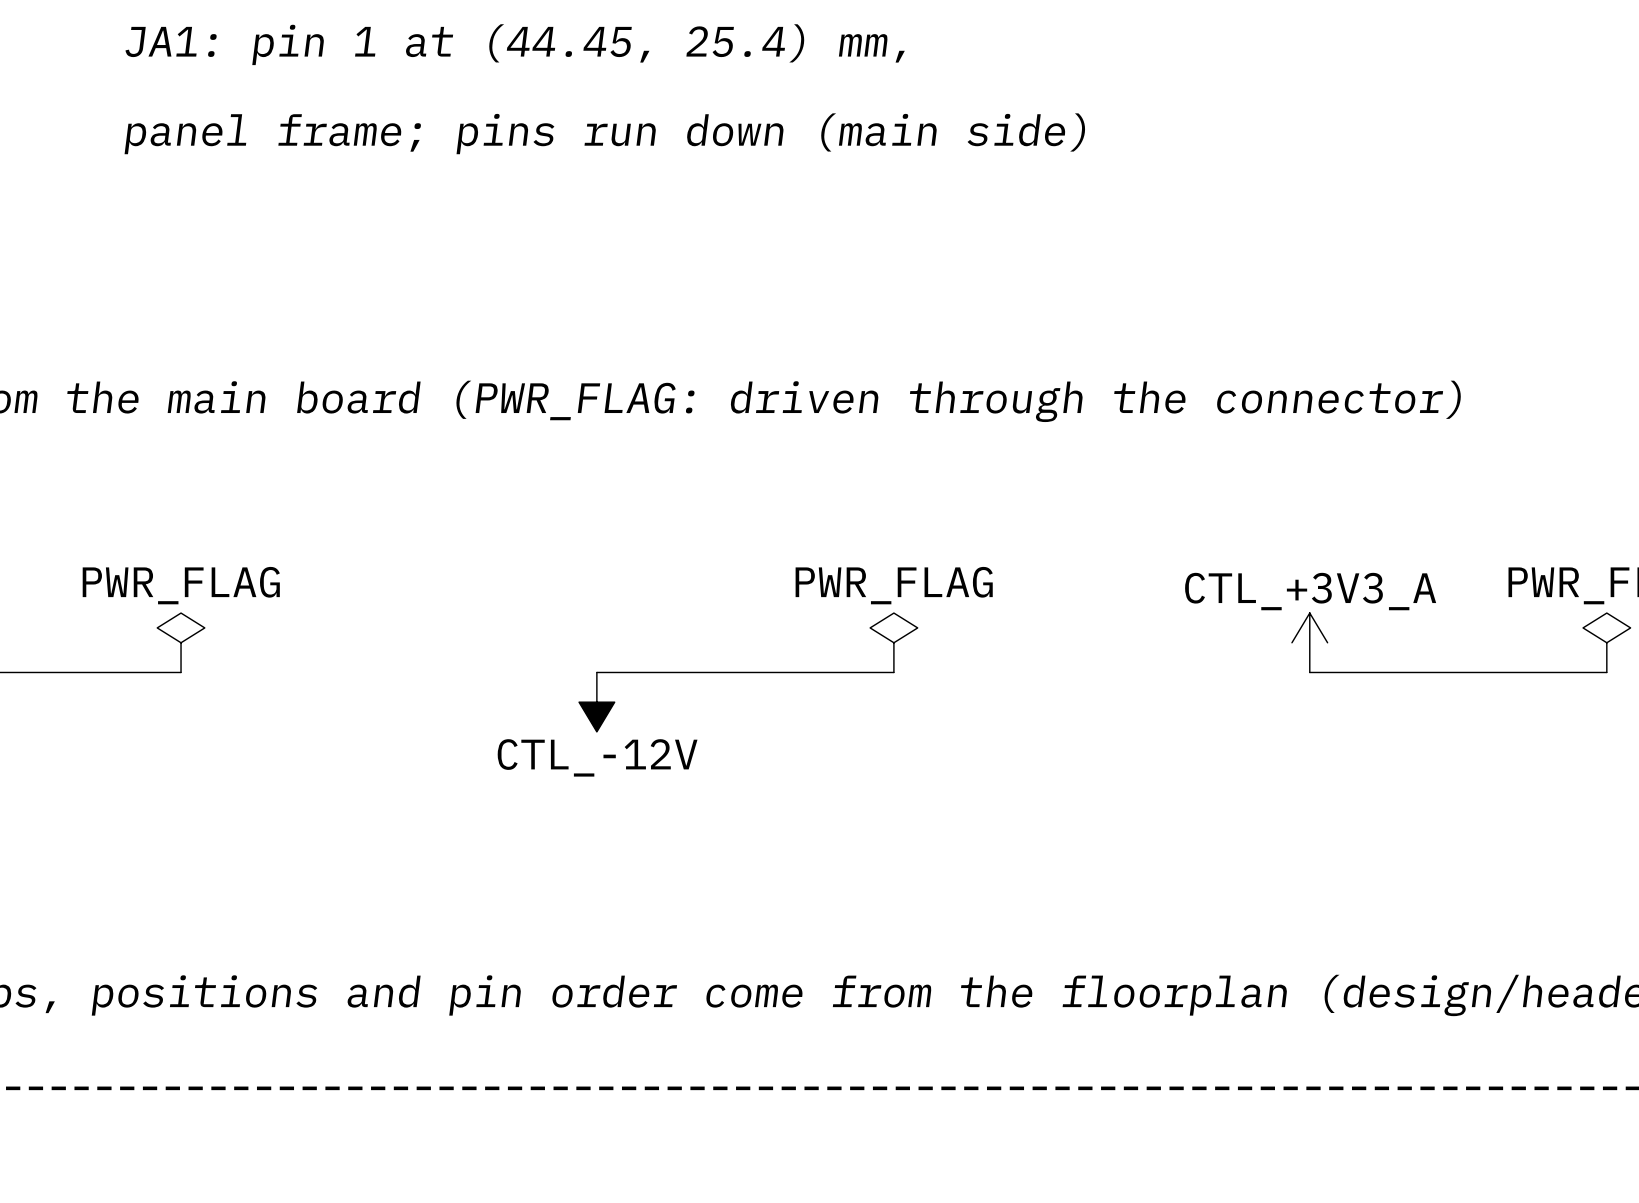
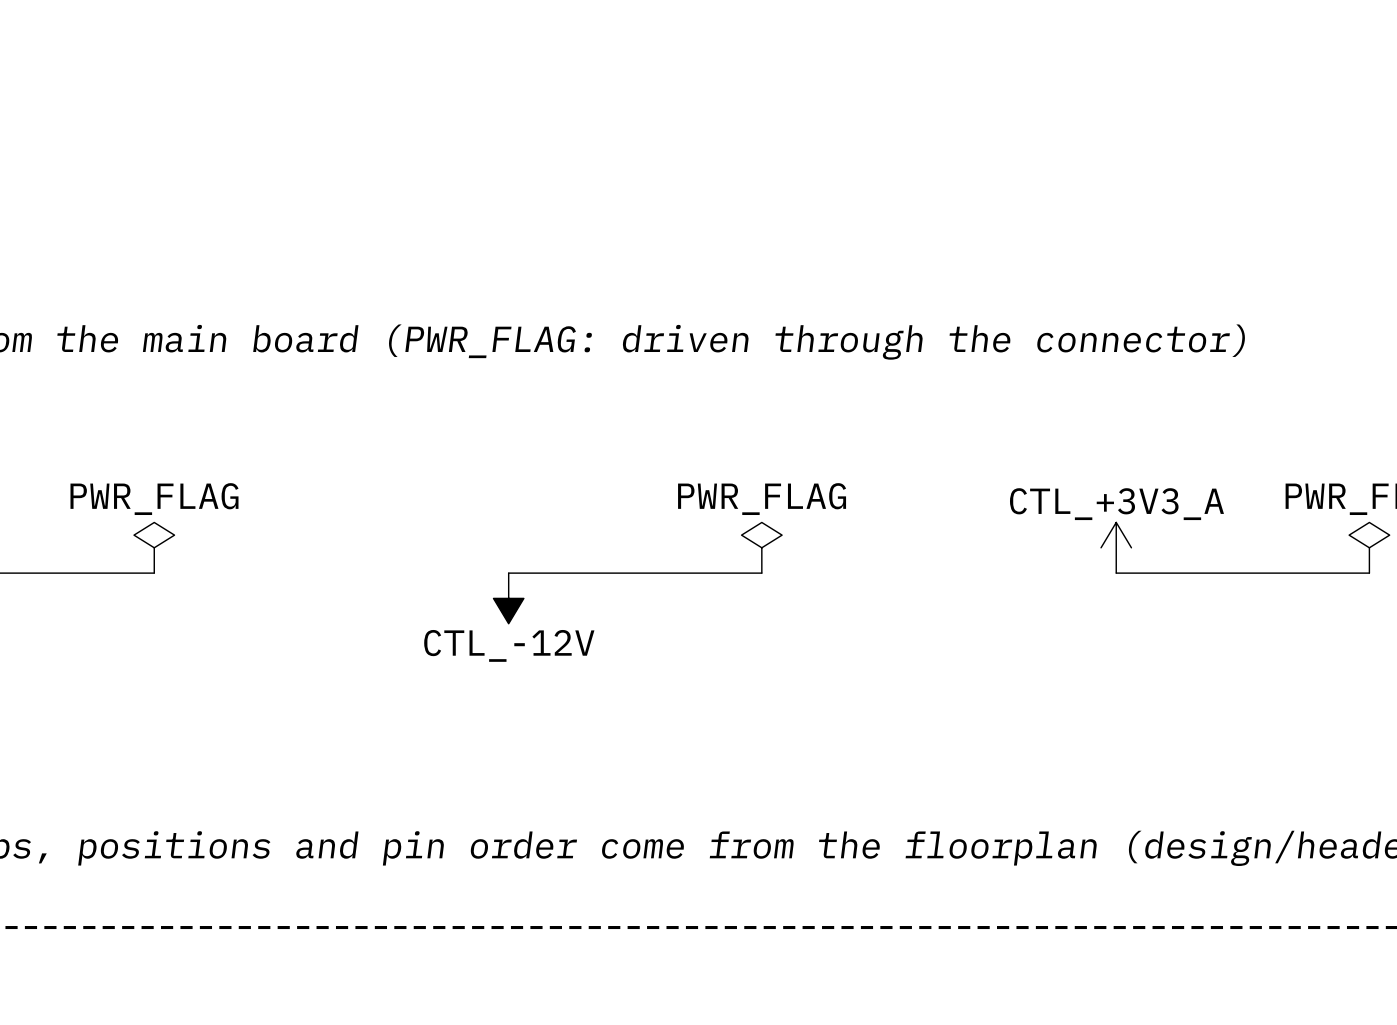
text: JA1: pin 1 at (44.45, 25.4) mm, (515, 44) -> none
text: panel frame; pins run down (main side) (604, 133) -> none

